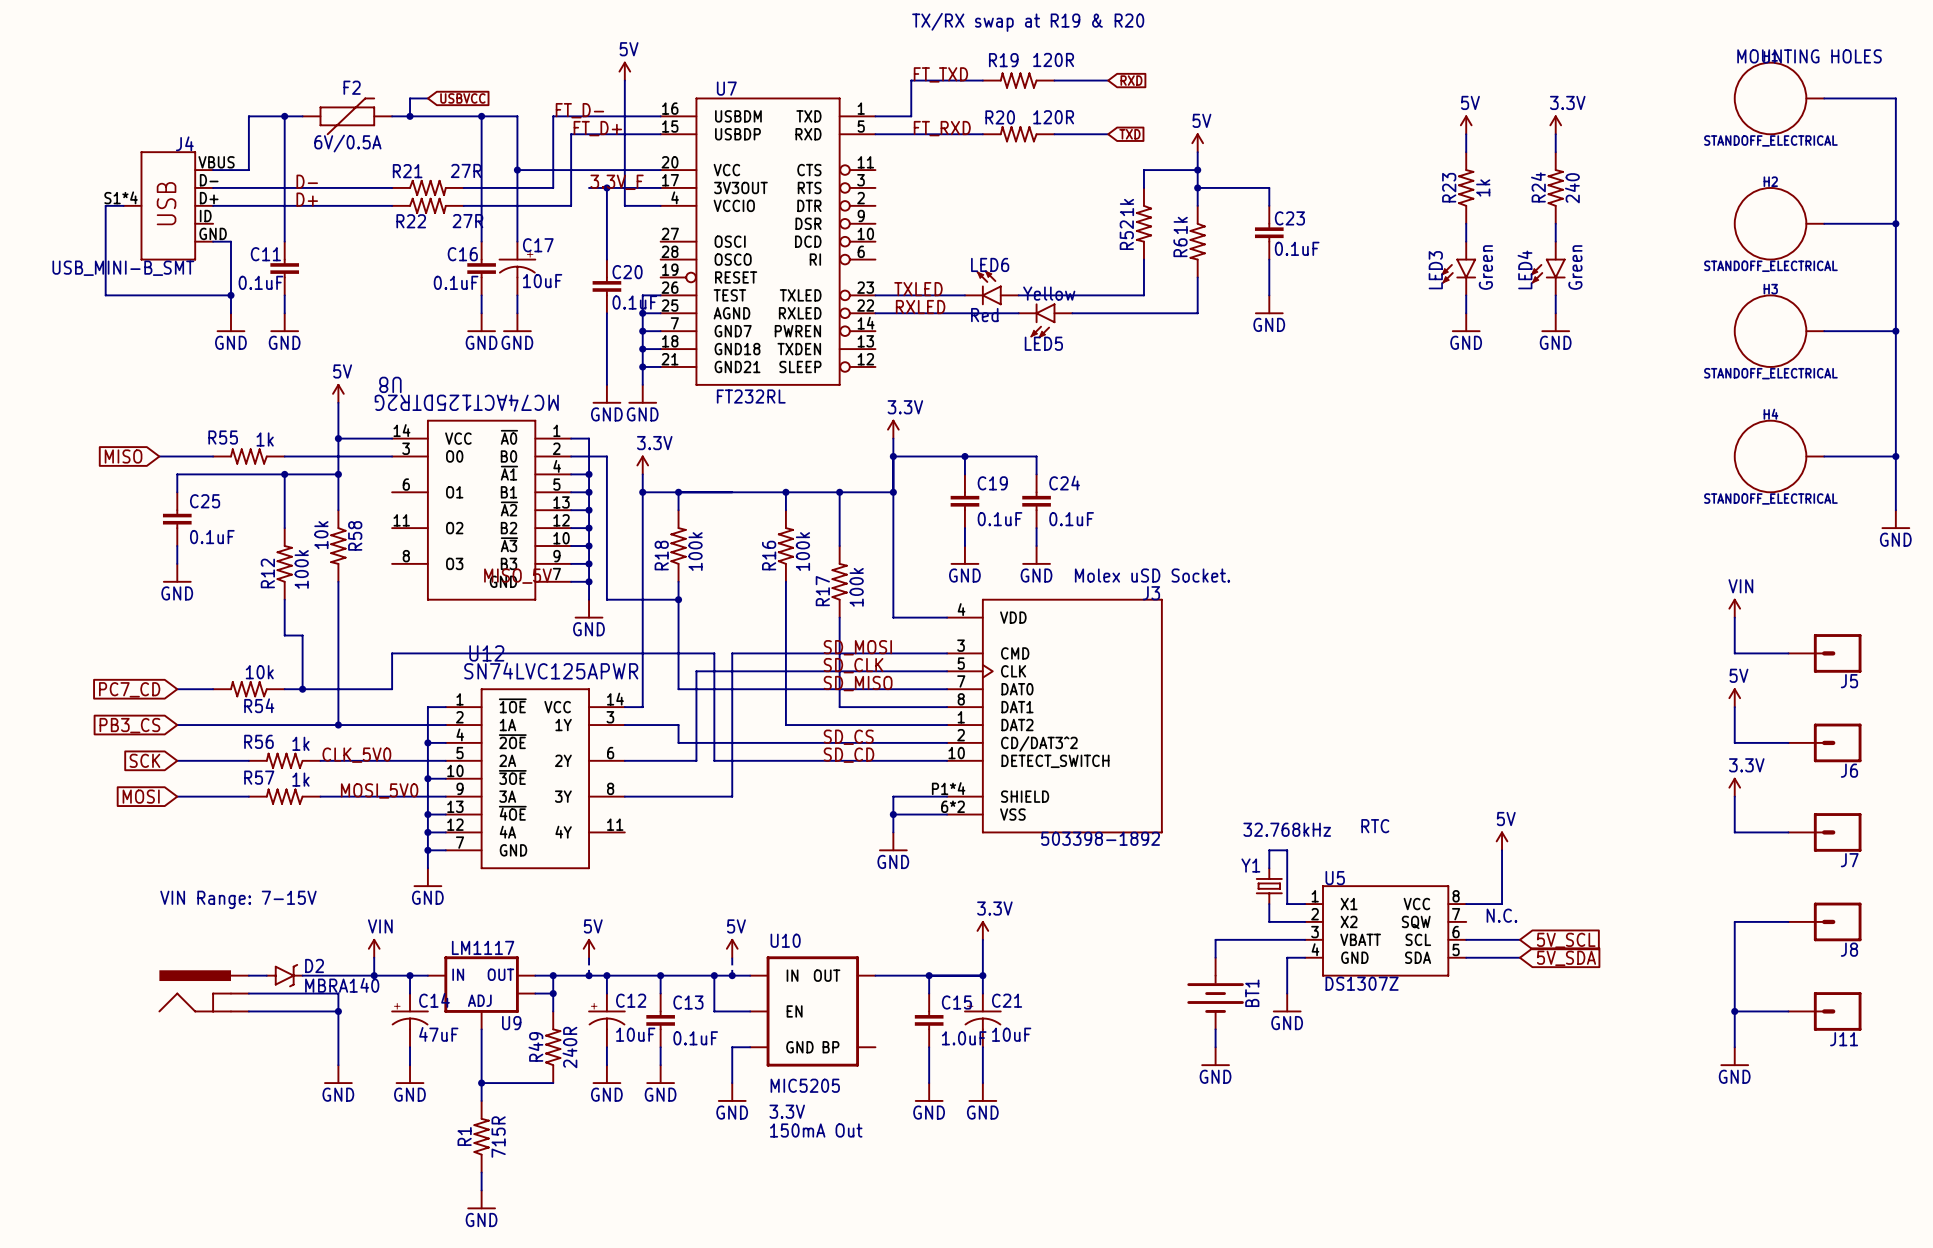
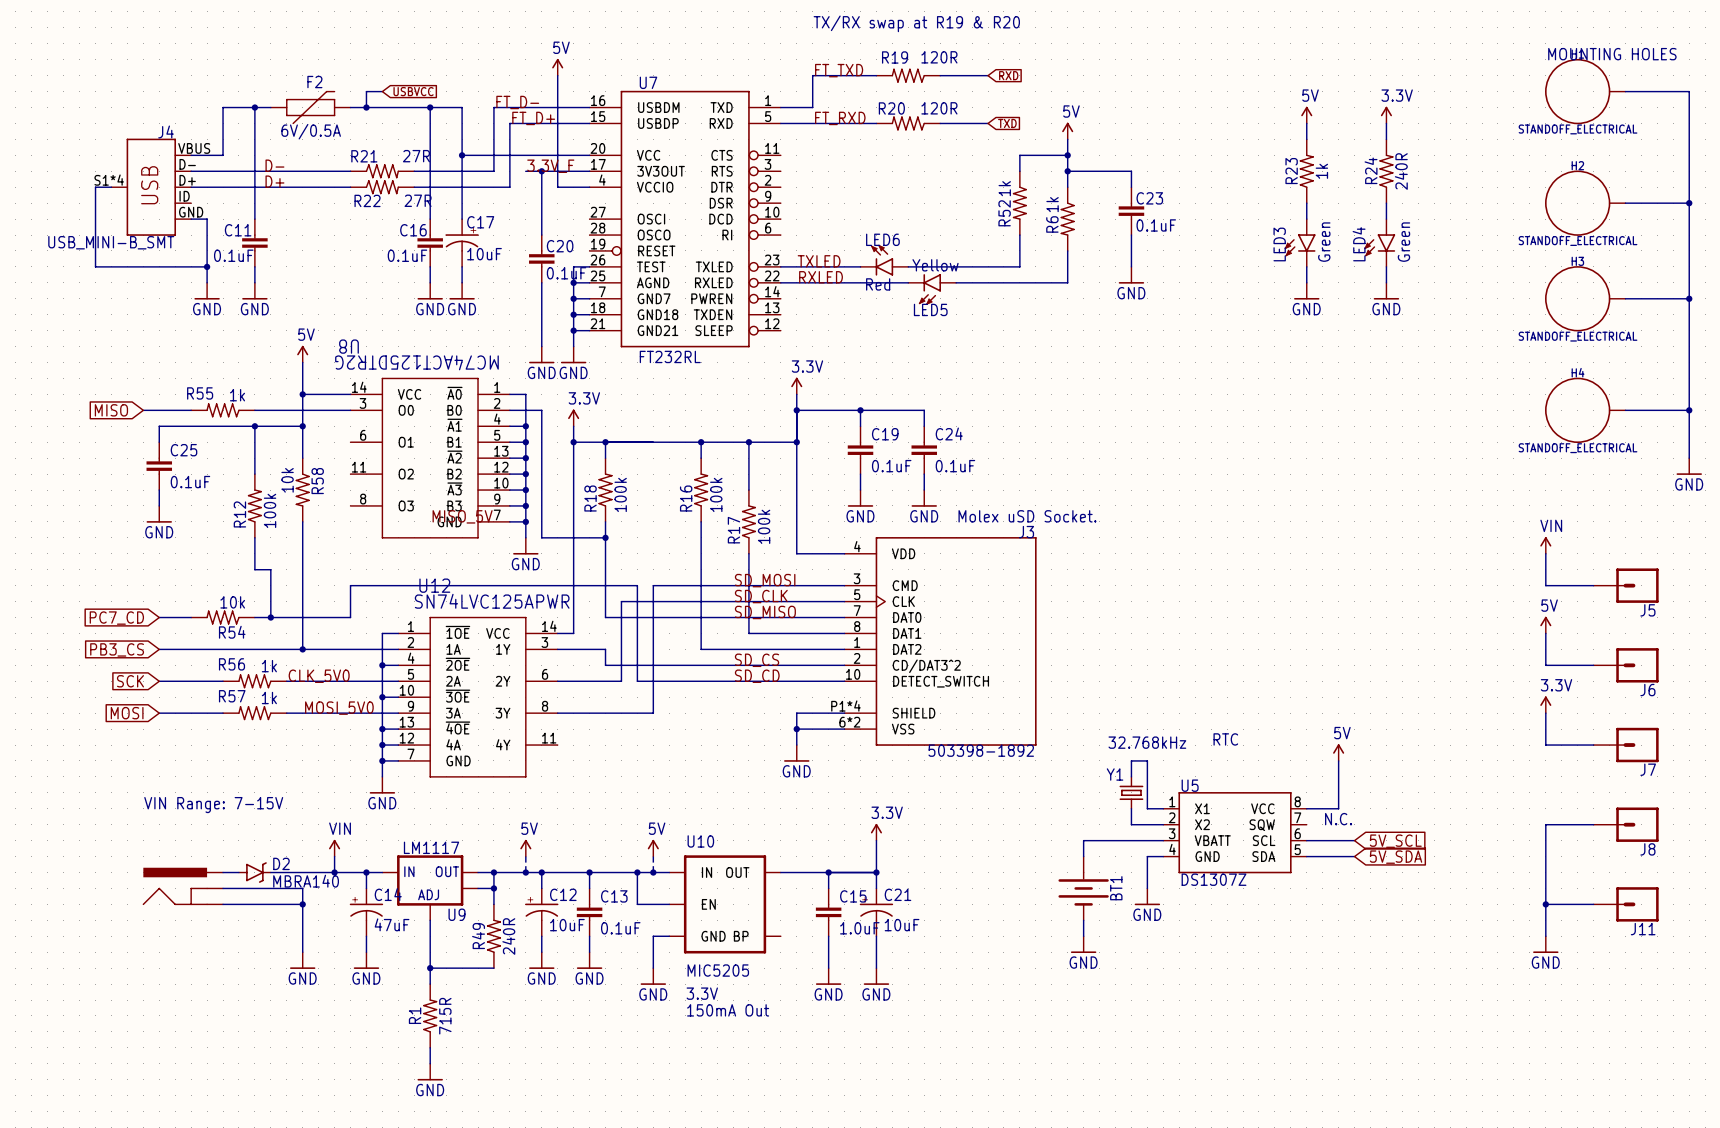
R24 value: 240 (1572, 188) -> 240R (1401, 171)

